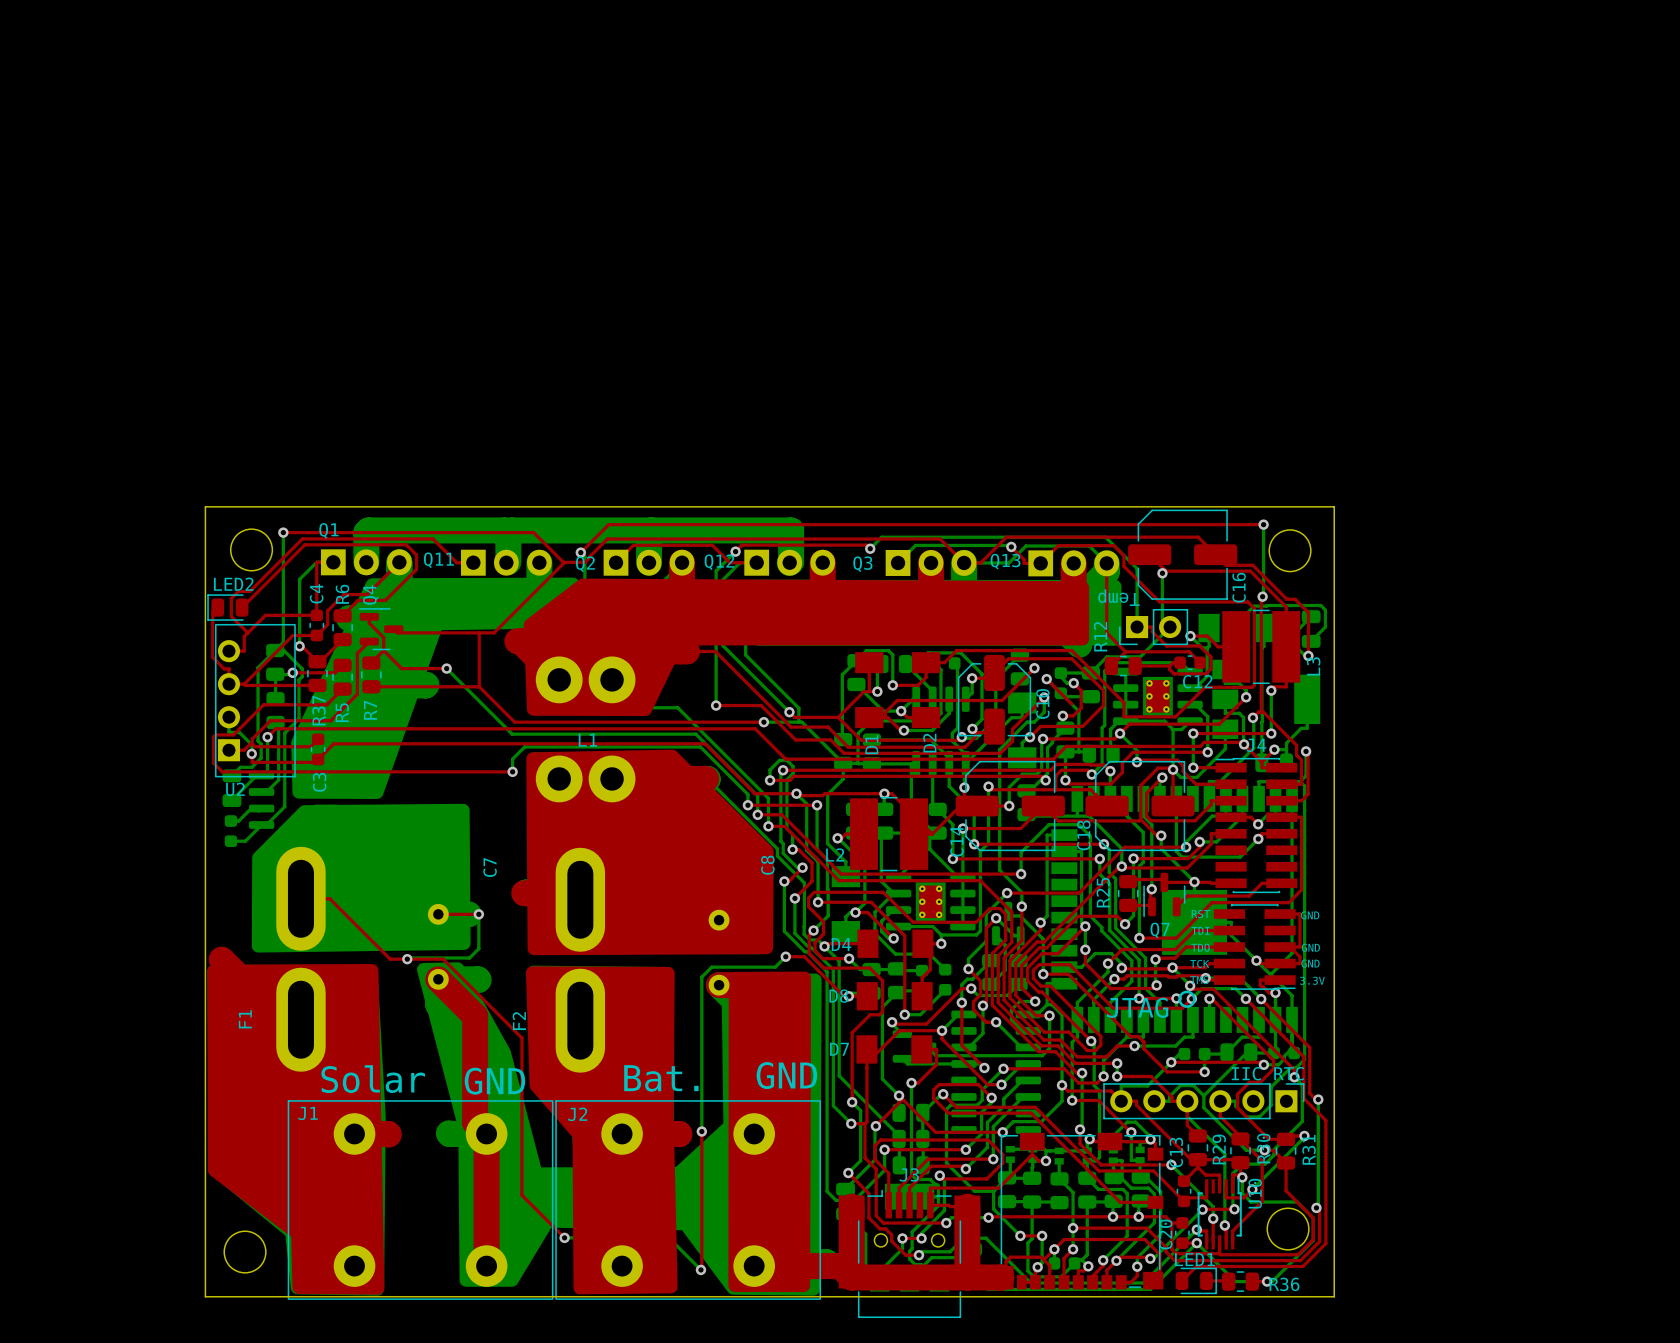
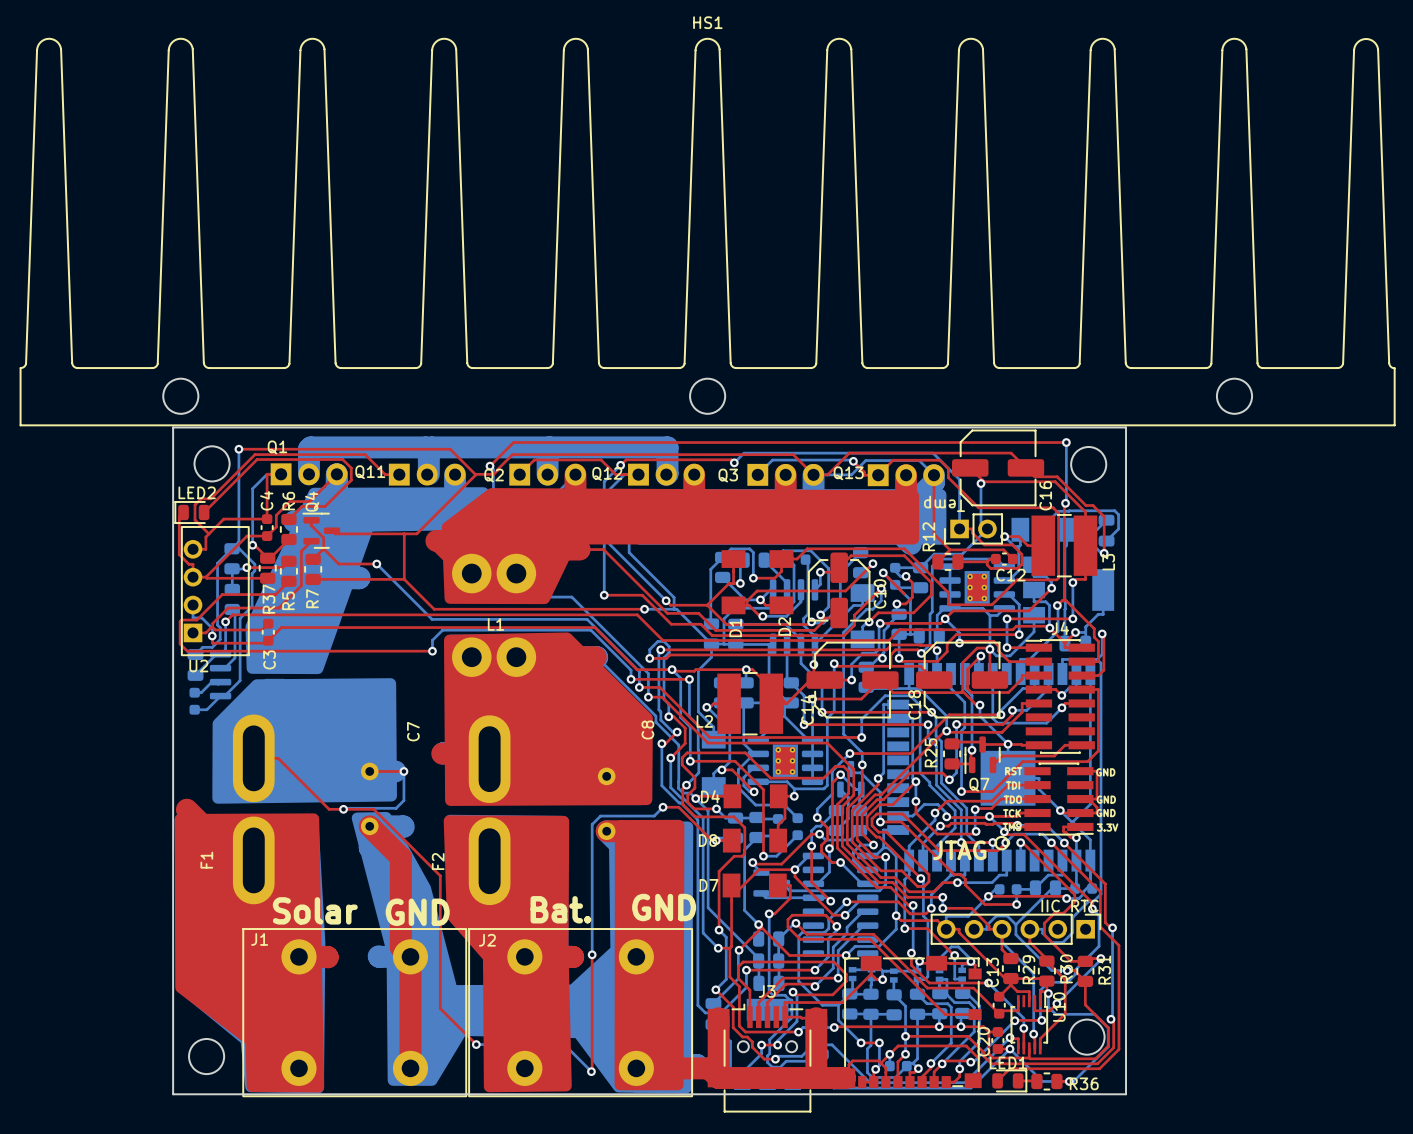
HS1: none -> (707, 232)

